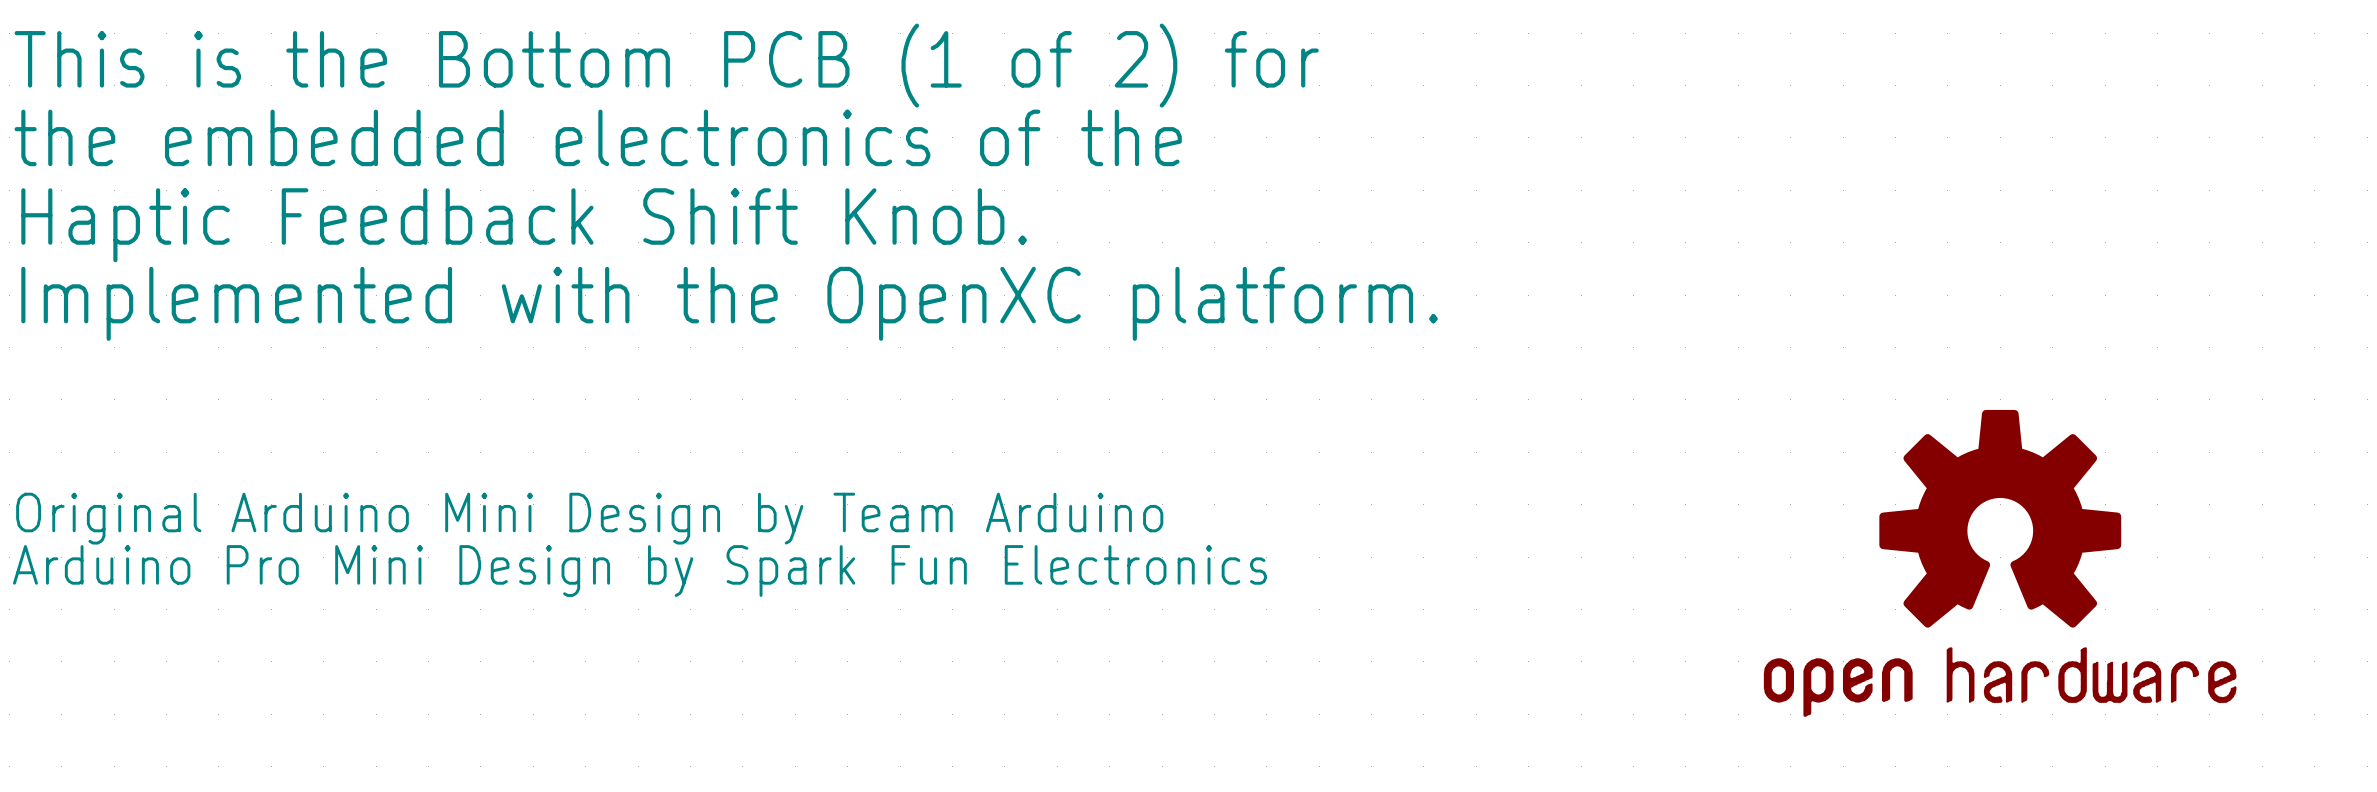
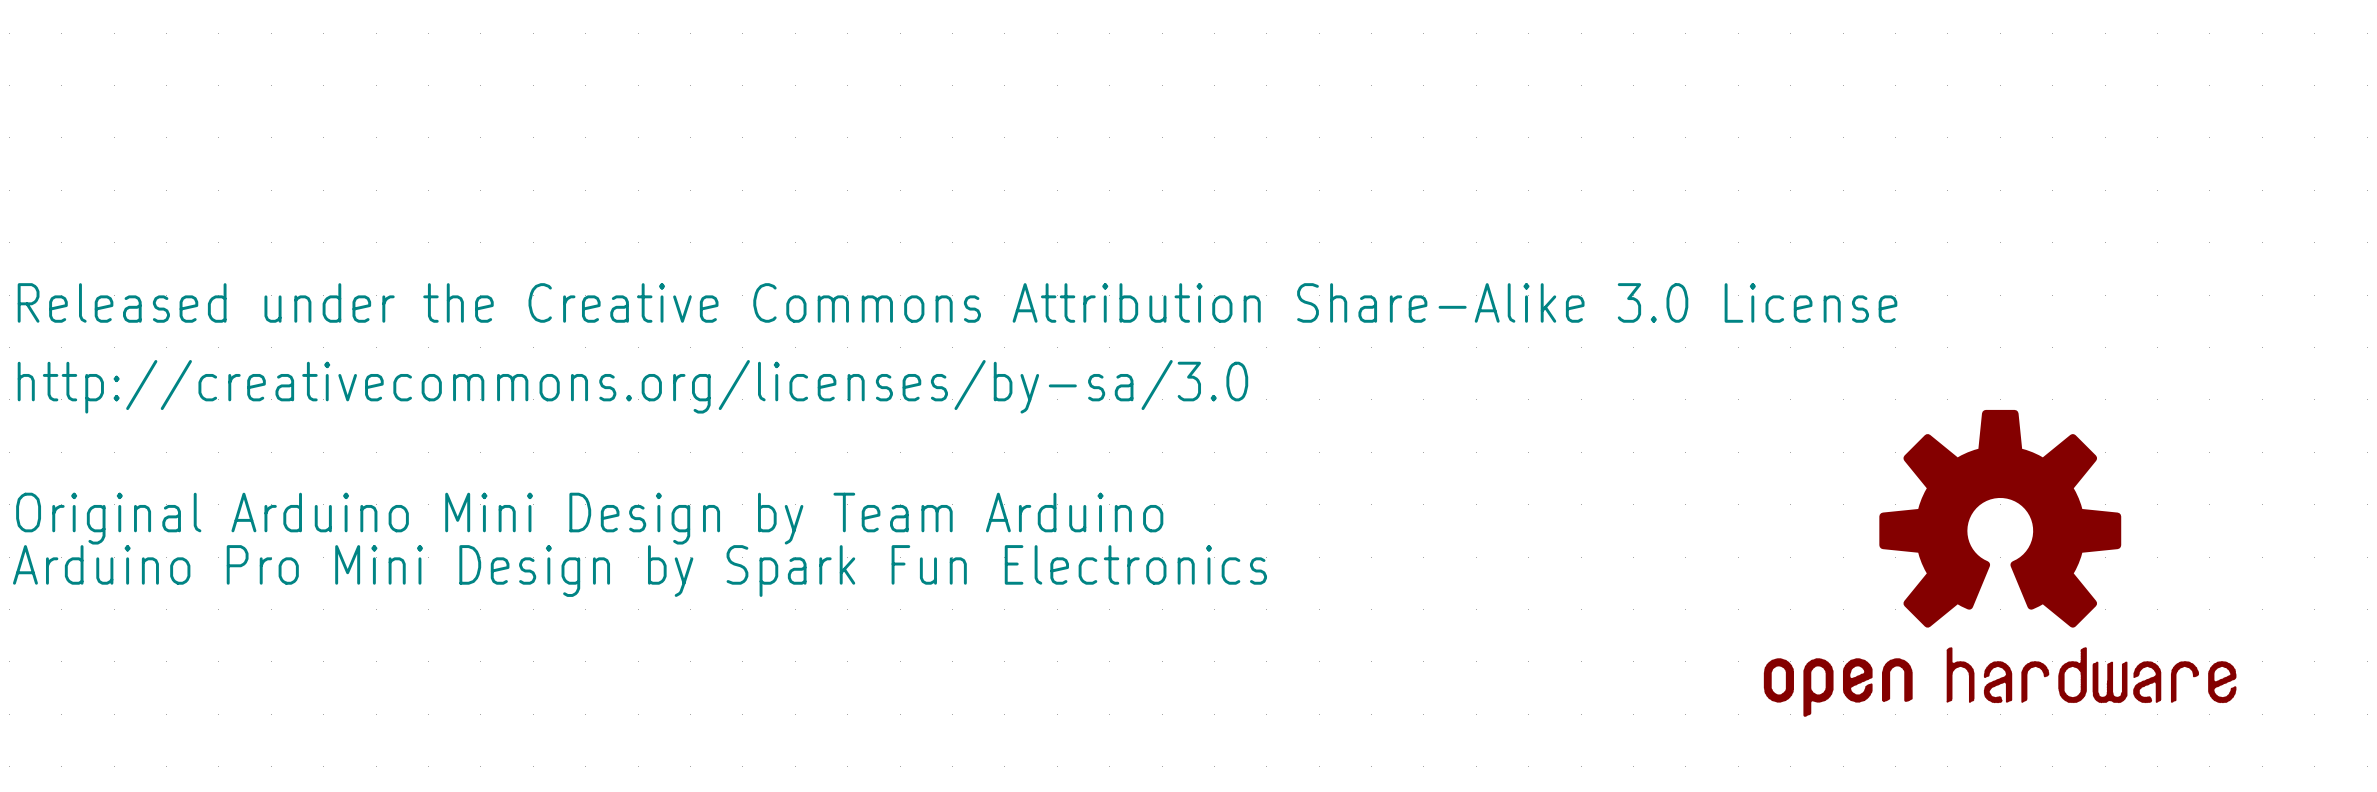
text: This is the Bottom PCB (1 of 2) for (666, 65) -> none
text: the embedded electronics of the (598, 137) -> none
text: Haptic Feedback Shift Knob. (524, 225) -> none
text: Implemented with the OpenXC platform. (729, 303) -> Released under the Creative Commons Attribution Share-Alike 3.0 License (957, 302)
text: none -> http://creativecommons.org/licenses/by-sa/3.0 (632, 386)

